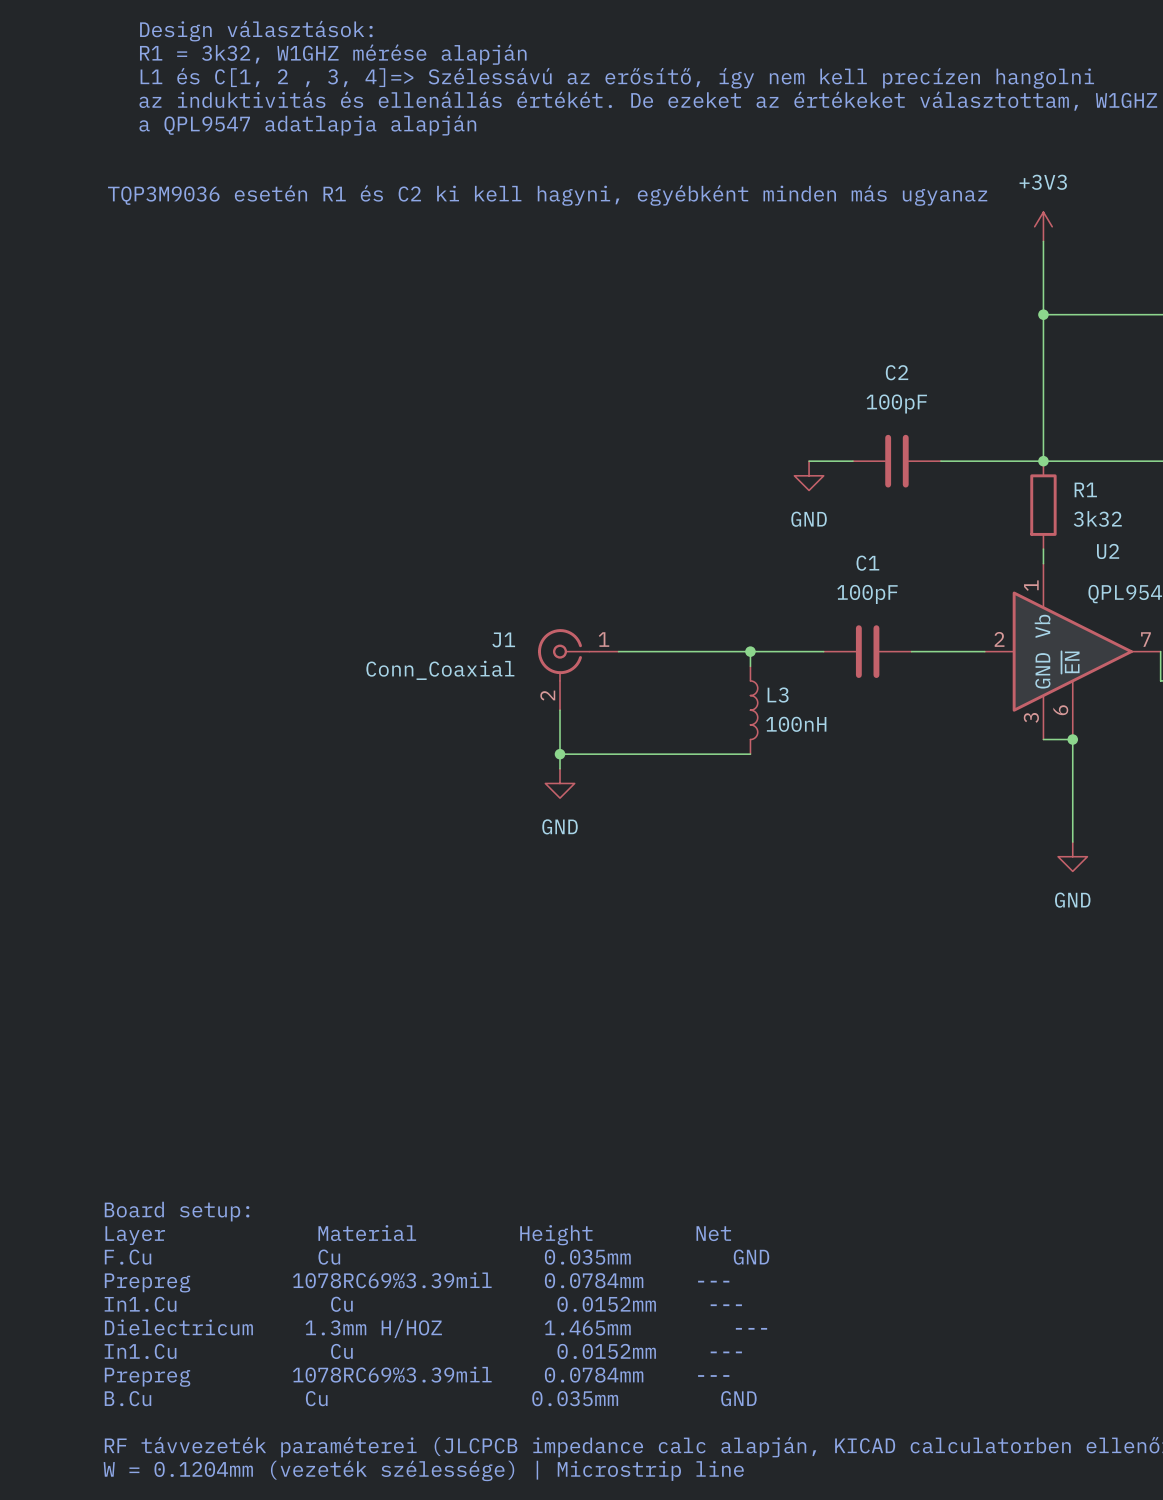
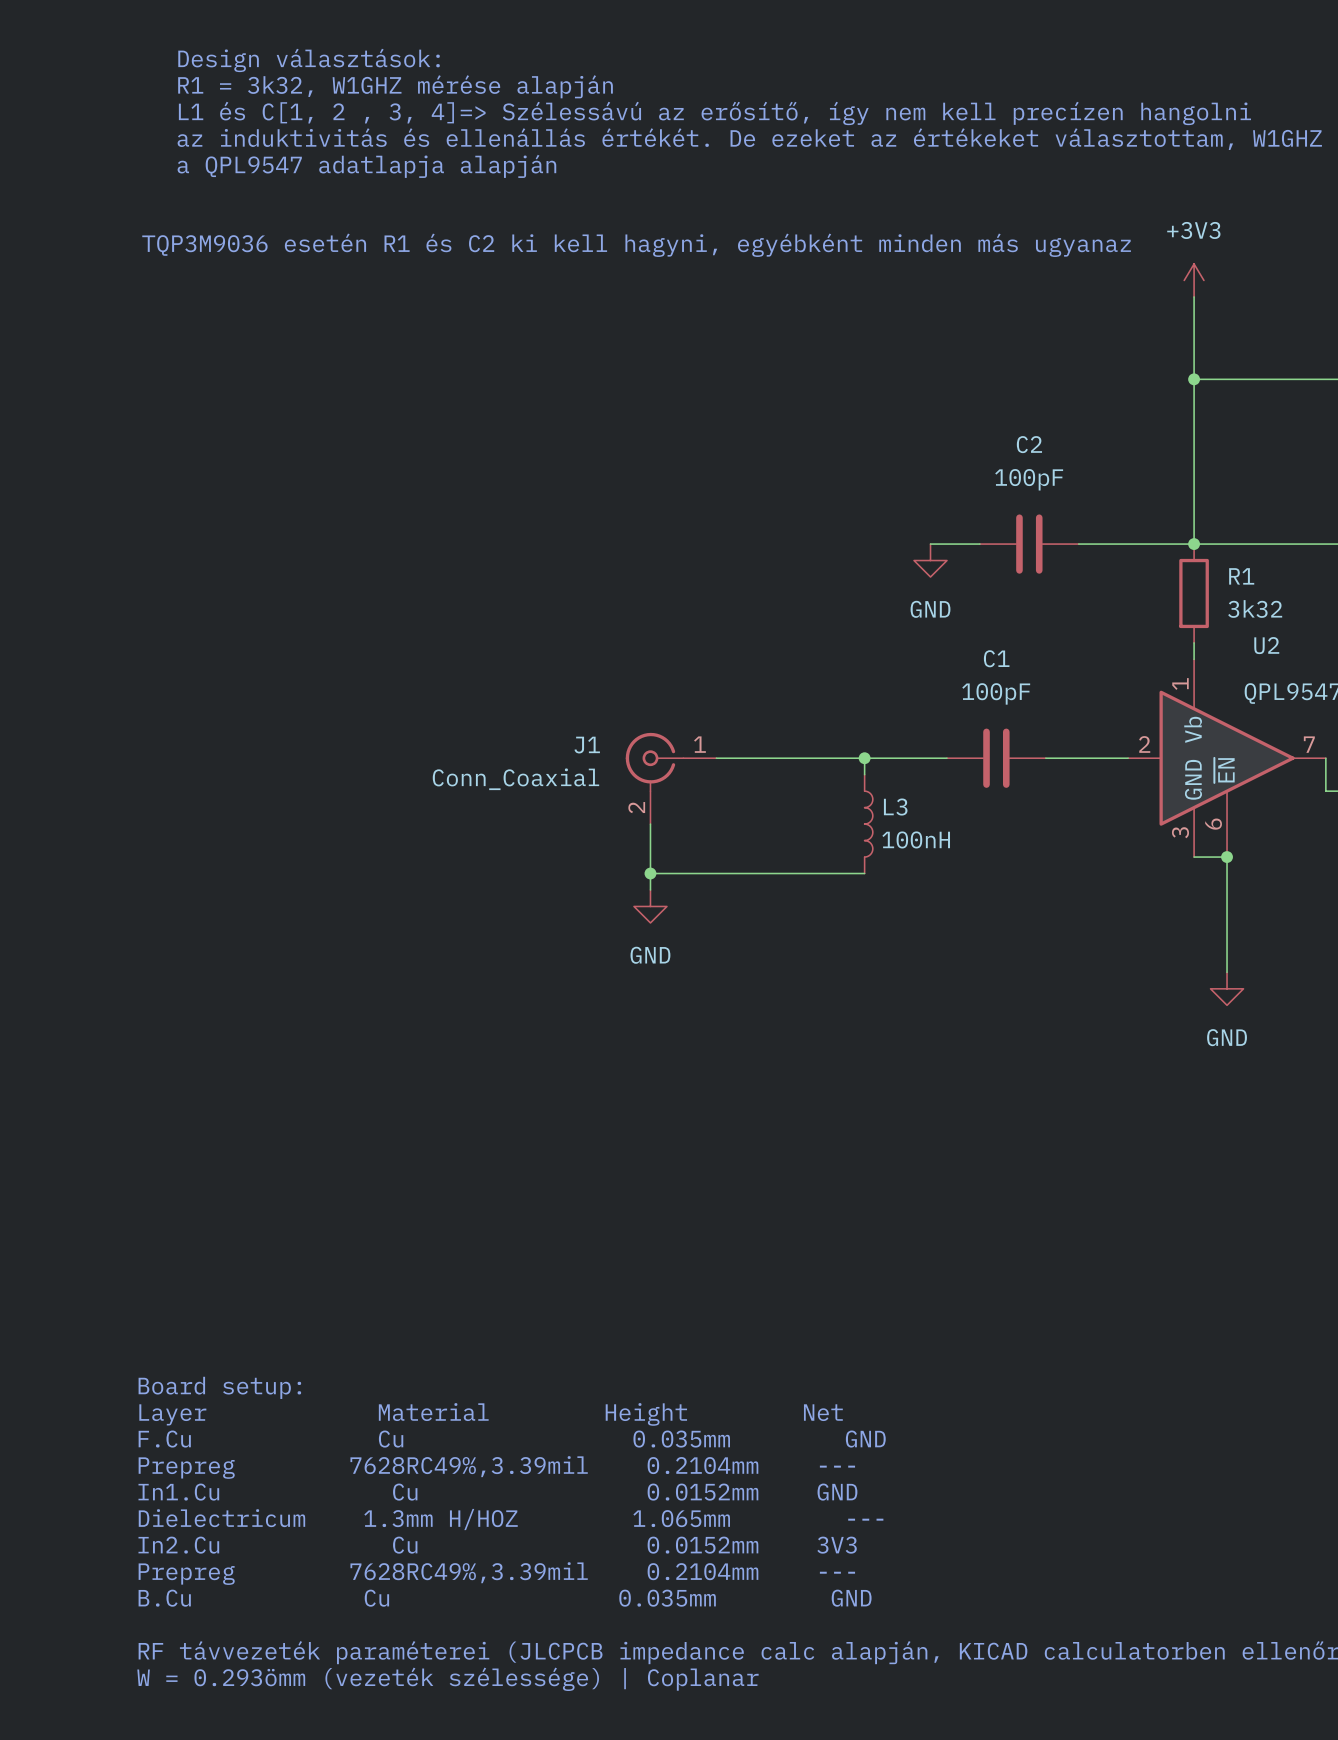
text: Prepreg 1078RC69%3.39mil 0.0784mm --- (417, 1282) -> Prepreg 7628RC49%,3.39mil 0.2104mm --- (496, 1467)
text: In1.Cu Cu 0.0152mm --- (423, 1304) -> In1.Cu Cu 0.0152mm GND (497, 1492)
text: Dielectricum 1.3mm H/HOZ 1.465mm --- (436, 1328) -> Dielectricum 1.3mm H/HOZ 1.065mm --- (511, 1519)
text: In1.Cu Cu 0.0152mm --- (423, 1351) -> In2.Cu Cu 0.0152mm 3V3 (497, 1545)
text: Prepreg 1078RC69%3.39mil 0.0784mm --- (417, 1376) -> Prepreg 7628RC49%,3.39mil 0.2104mm --- (496, 1573)
text: W = 0.1204mm (vezeték szélessége) | Microstrip line (423, 1470) -> W = 0.293ömm (vezeték szélessége) | Coplanar (447, 1679)

